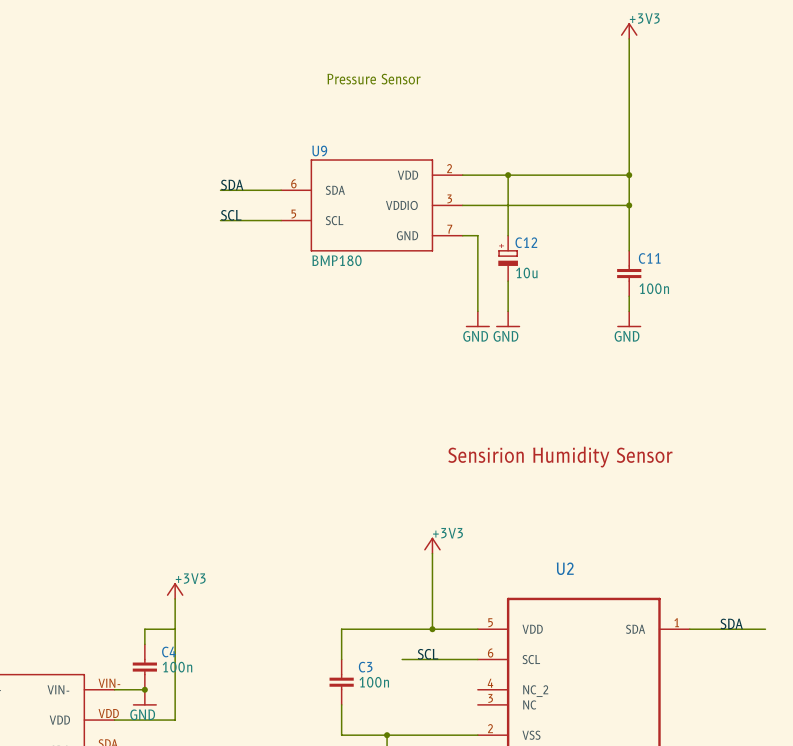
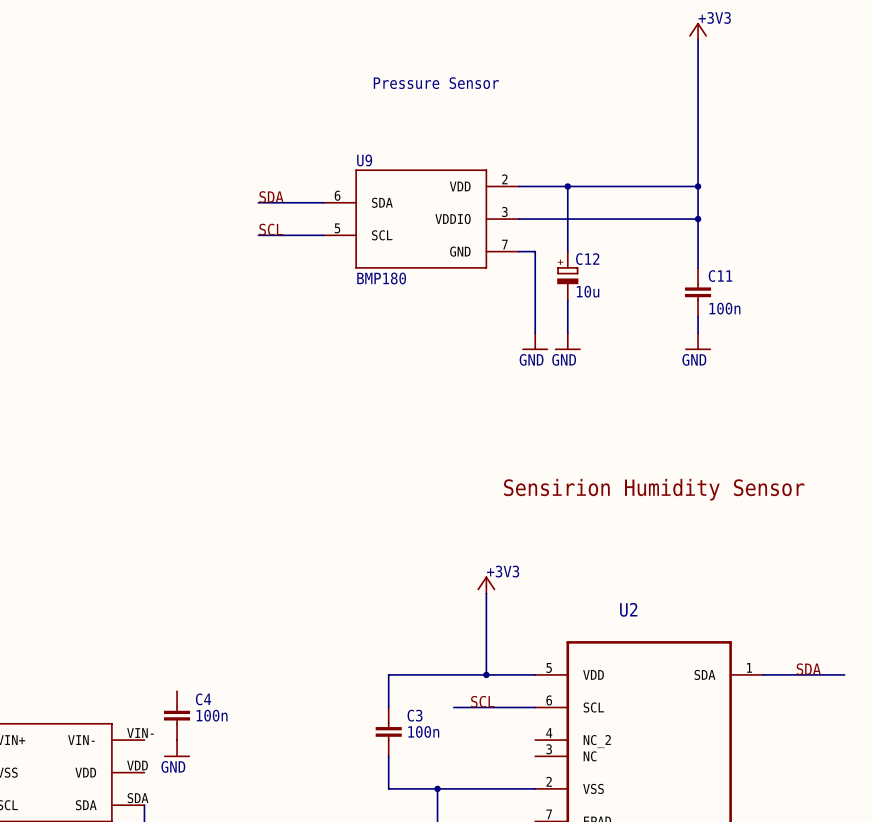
power symbol: +3V3 (175, 591) -> none
wire: (175, 598) (175, 720) (114, 720) -> none
wire: (175, 629) (144, 629) (144, 644) -> none
wire: (114, 689) (144, 689) -> none
junction: (144, 689) -> none

